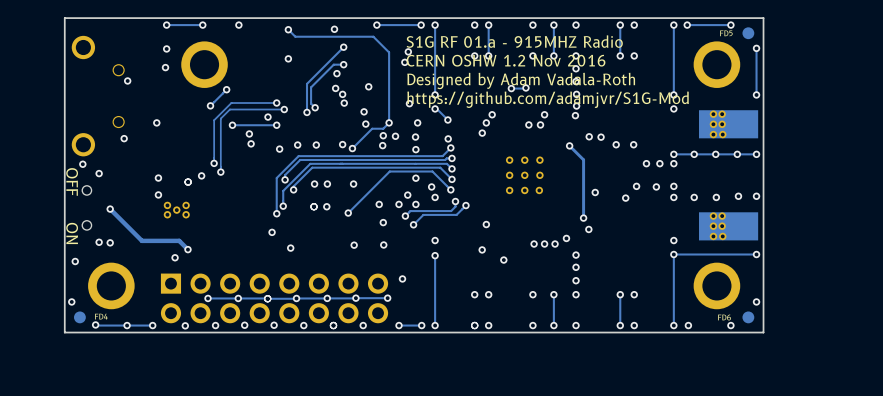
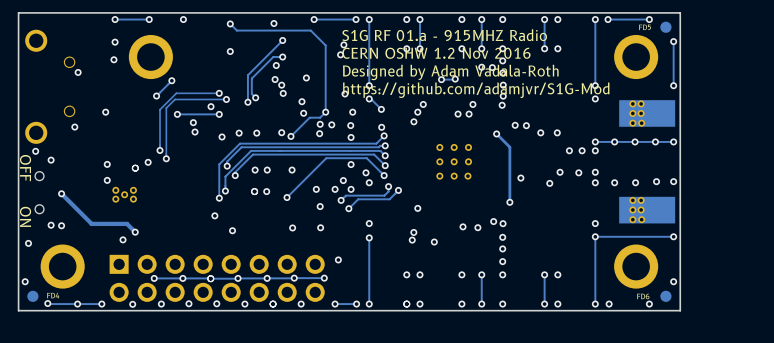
via: none -> (481, 67)
via: none -> (492, 67)
via: (588, 229) -> none
via: none -> (503, 223)
via: (544, 244) -> none
via: none -> (477, 227)
via: (555, 244) -> none
via: none -> (412, 240)

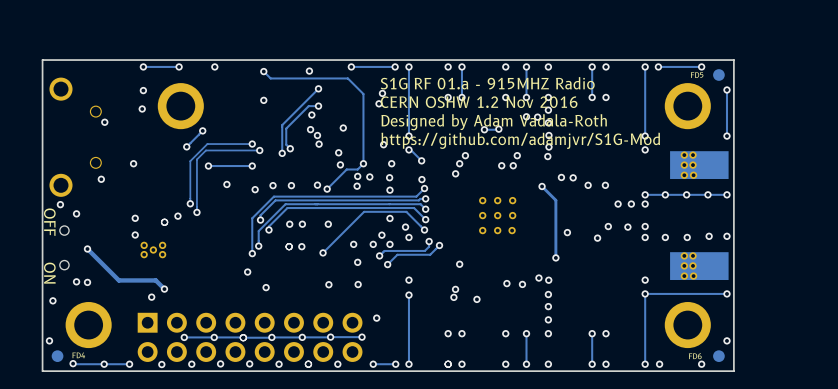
via: (211, 106) -> none
via: (193, 122) -> none

